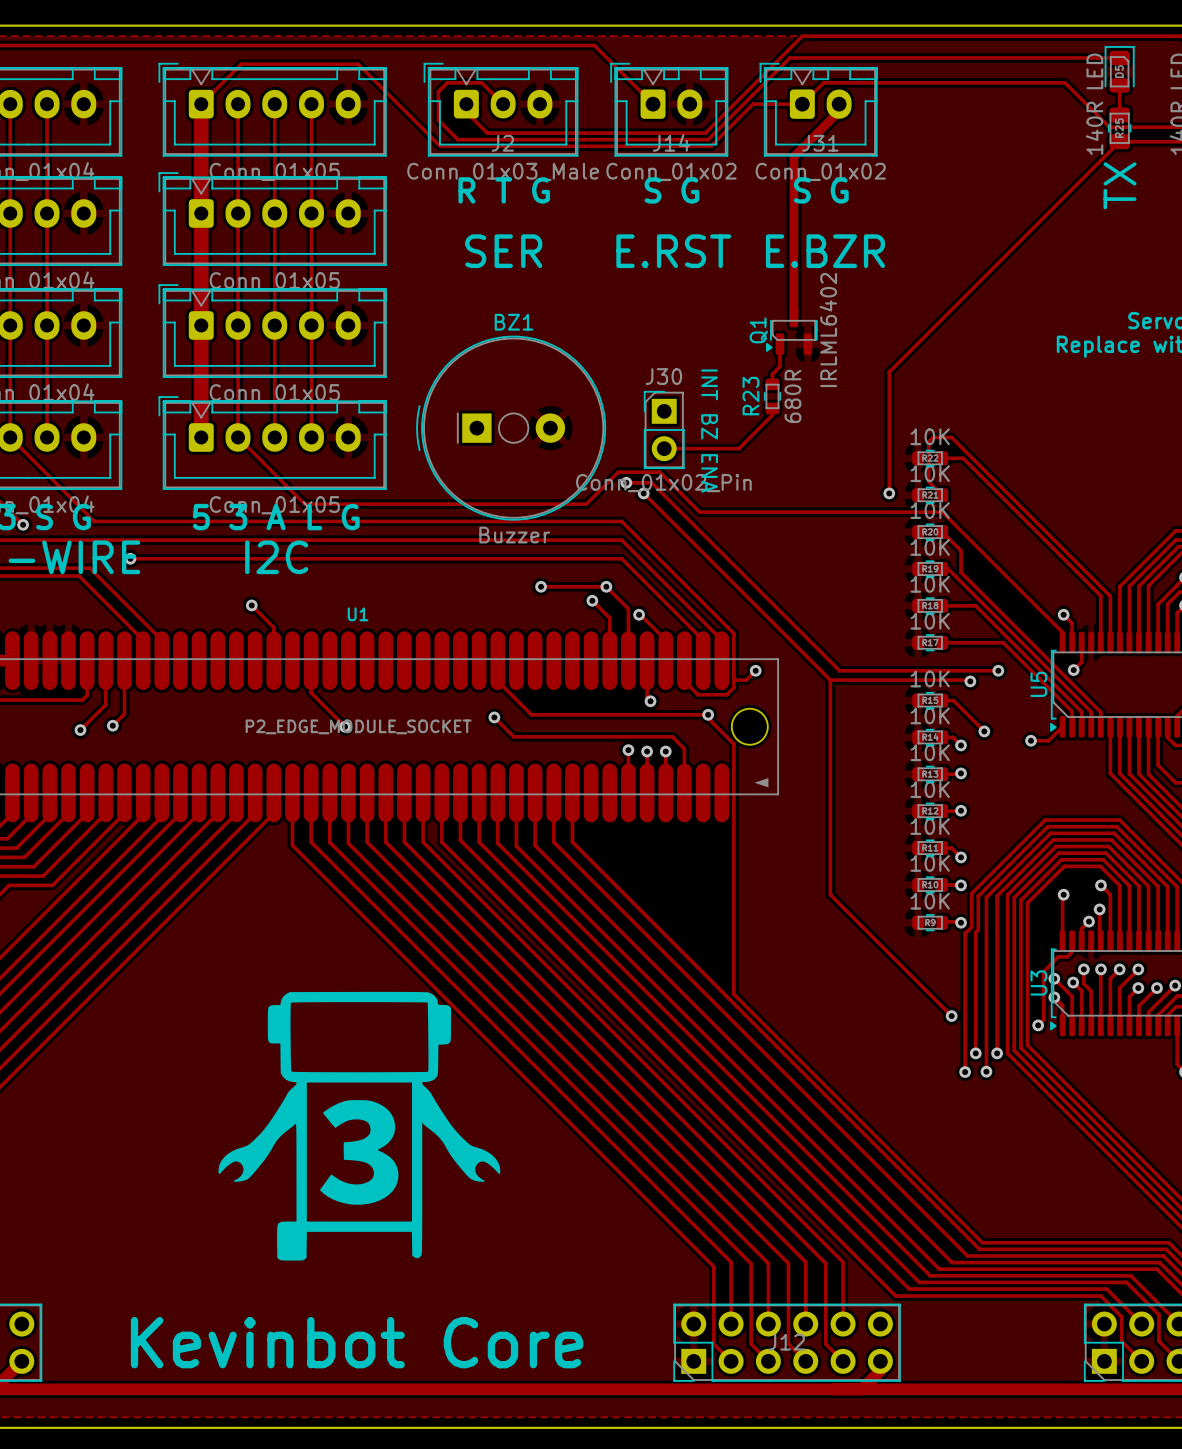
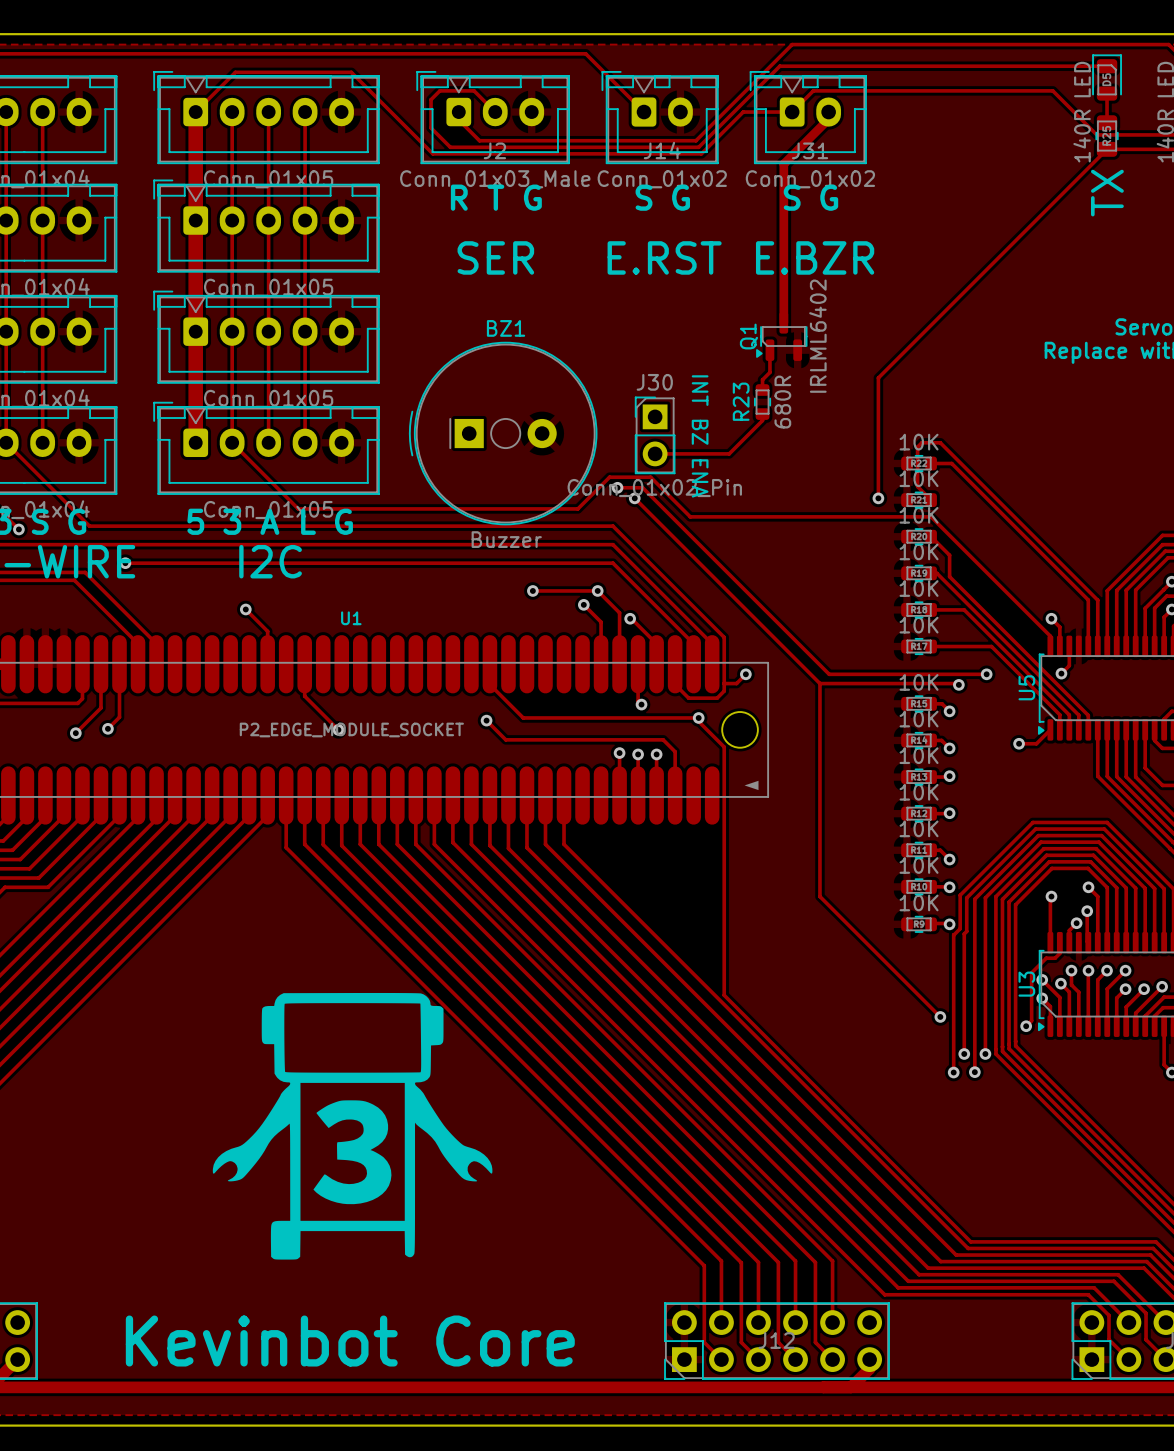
track: (961, 708) (984, 731) -> none
via position: (984, 731) -> (949, 711)

